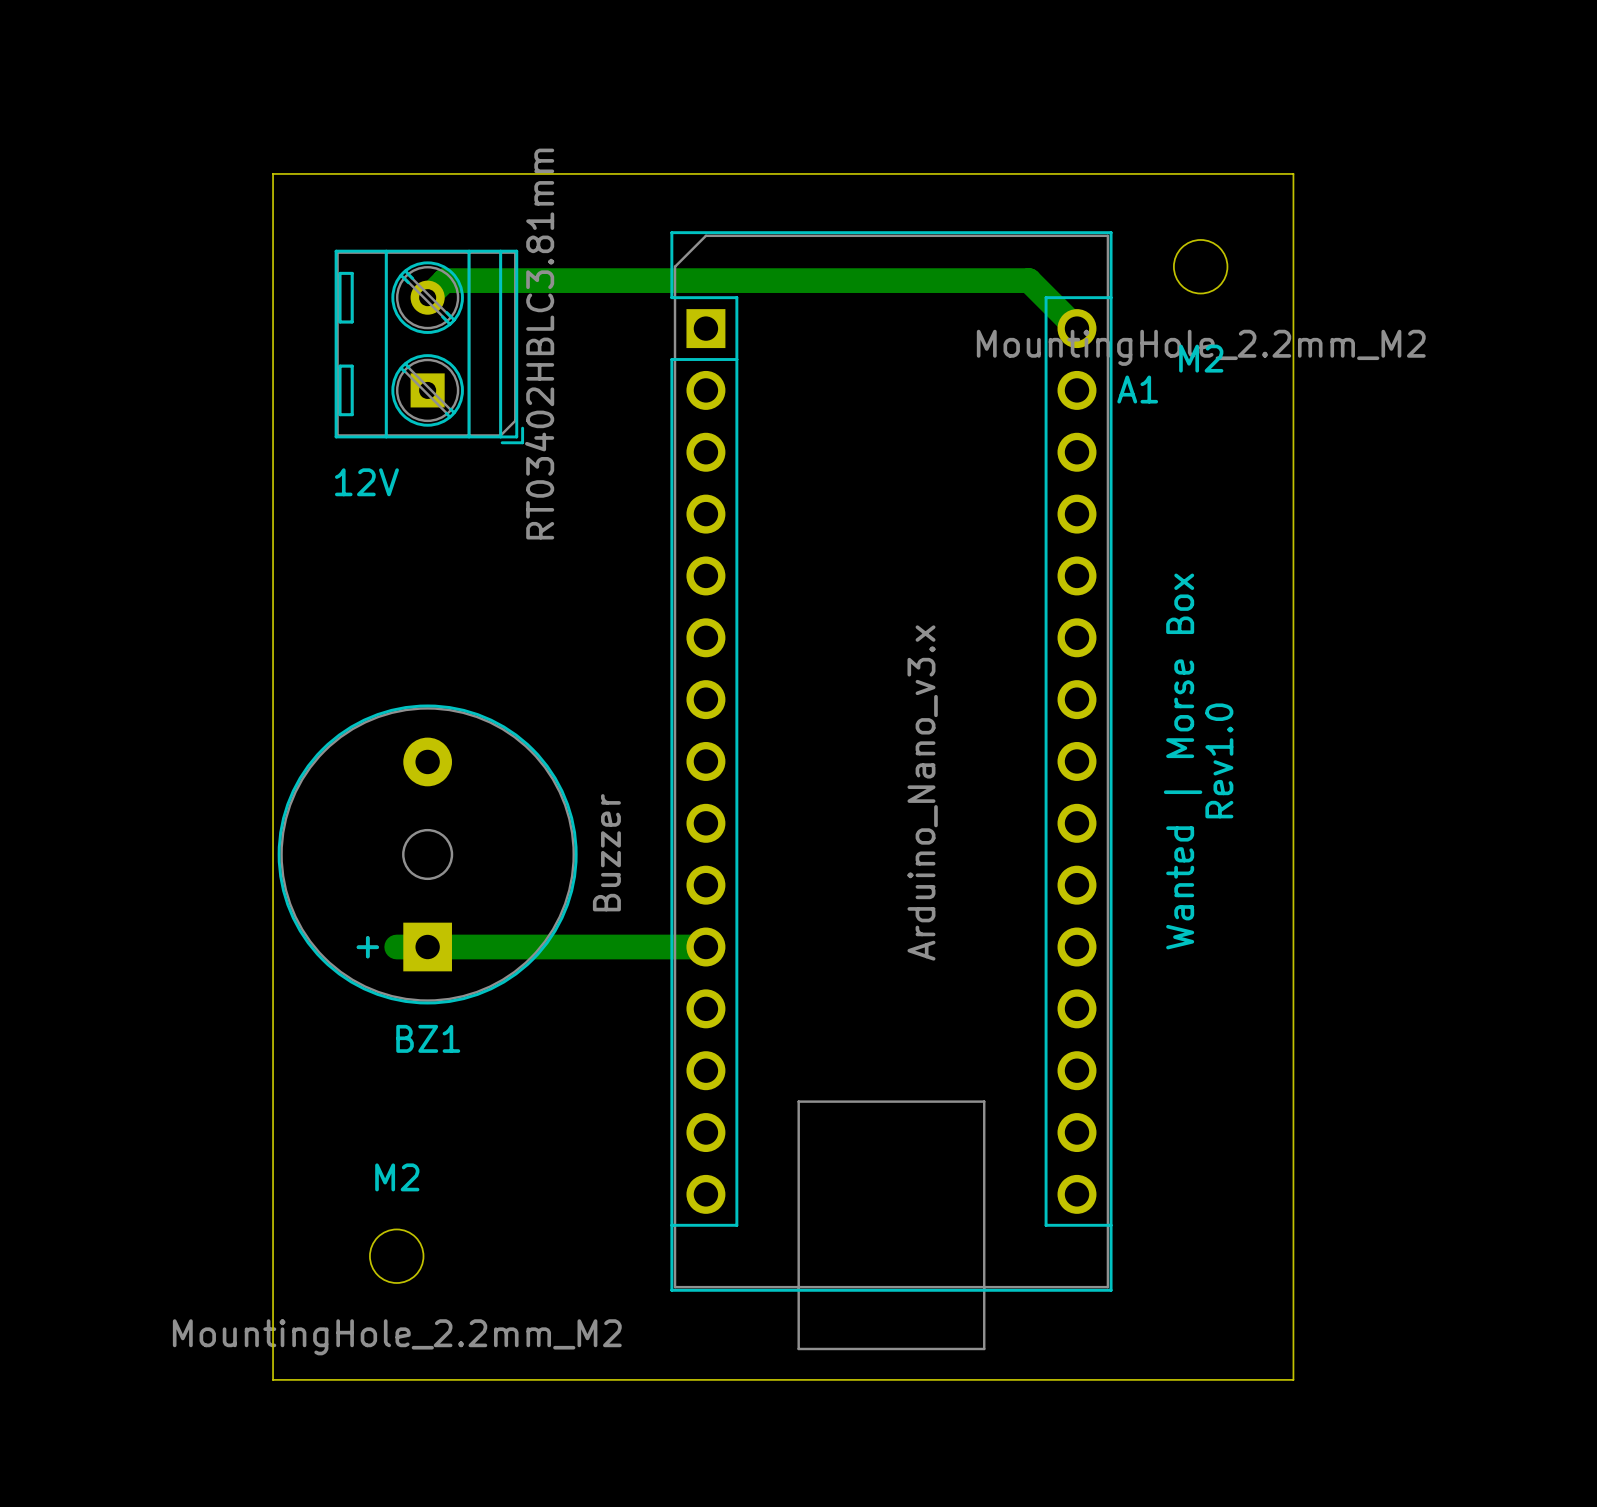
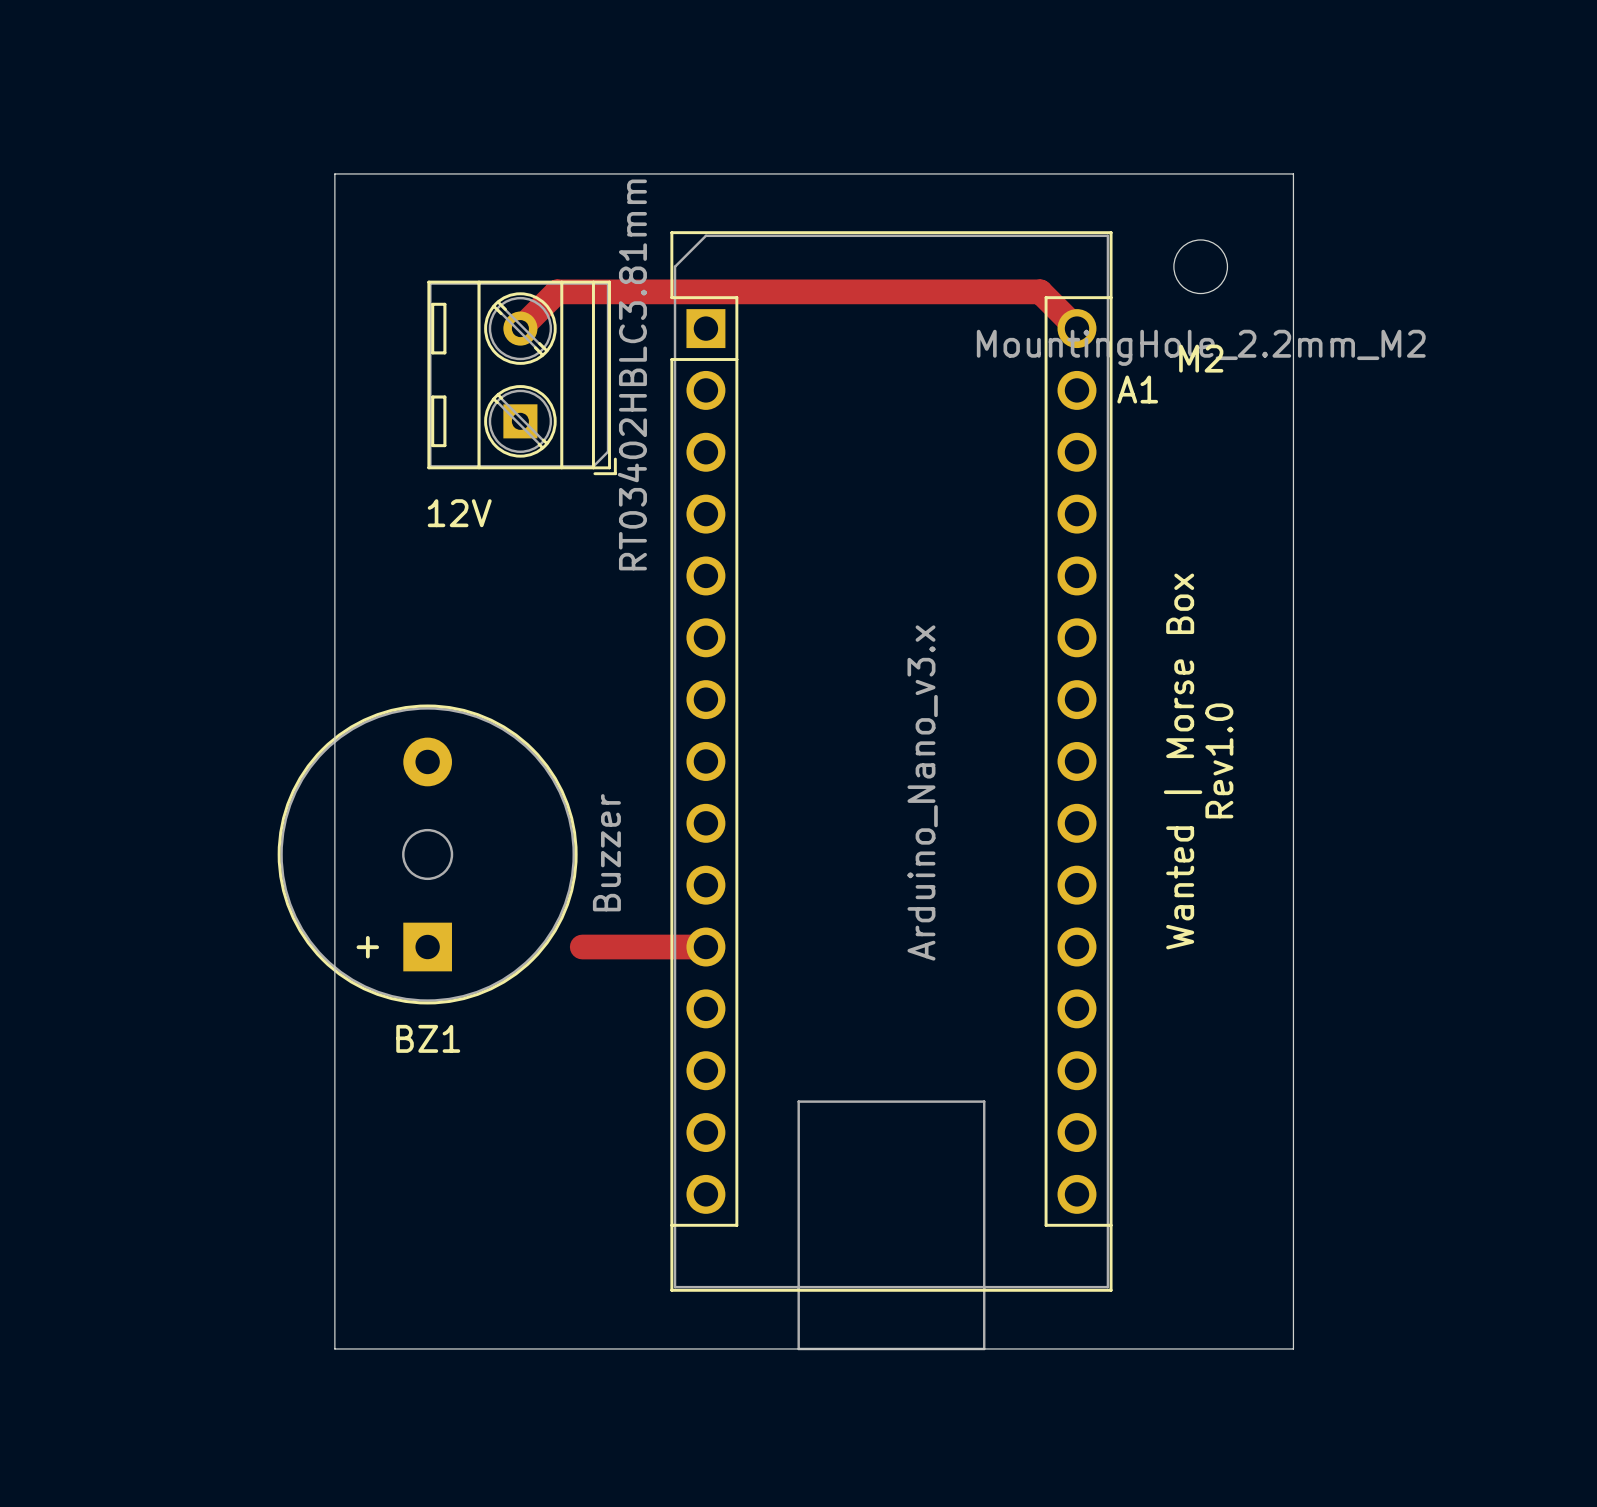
board edge: (334, 173) (273, 173) (273, 1379) (1293, 1379) (1293, 1348) -> (334, 173) (334, 1348) (1293, 1348)
bottom track: (427, 297) (444, 280) (1029, 280) (1076, 328) -> none
top track: none -> (520, 328) (557, 291) (1040, 291) (1076, 328)
12V position: (429, 346) -> (522, 377)
bottom track: (396, 947) (705, 947) -> none
top track: none -> (582, 947) (705, 947)
M2: MountingHole_2.2mm_M2 (396, 1256) -> none

